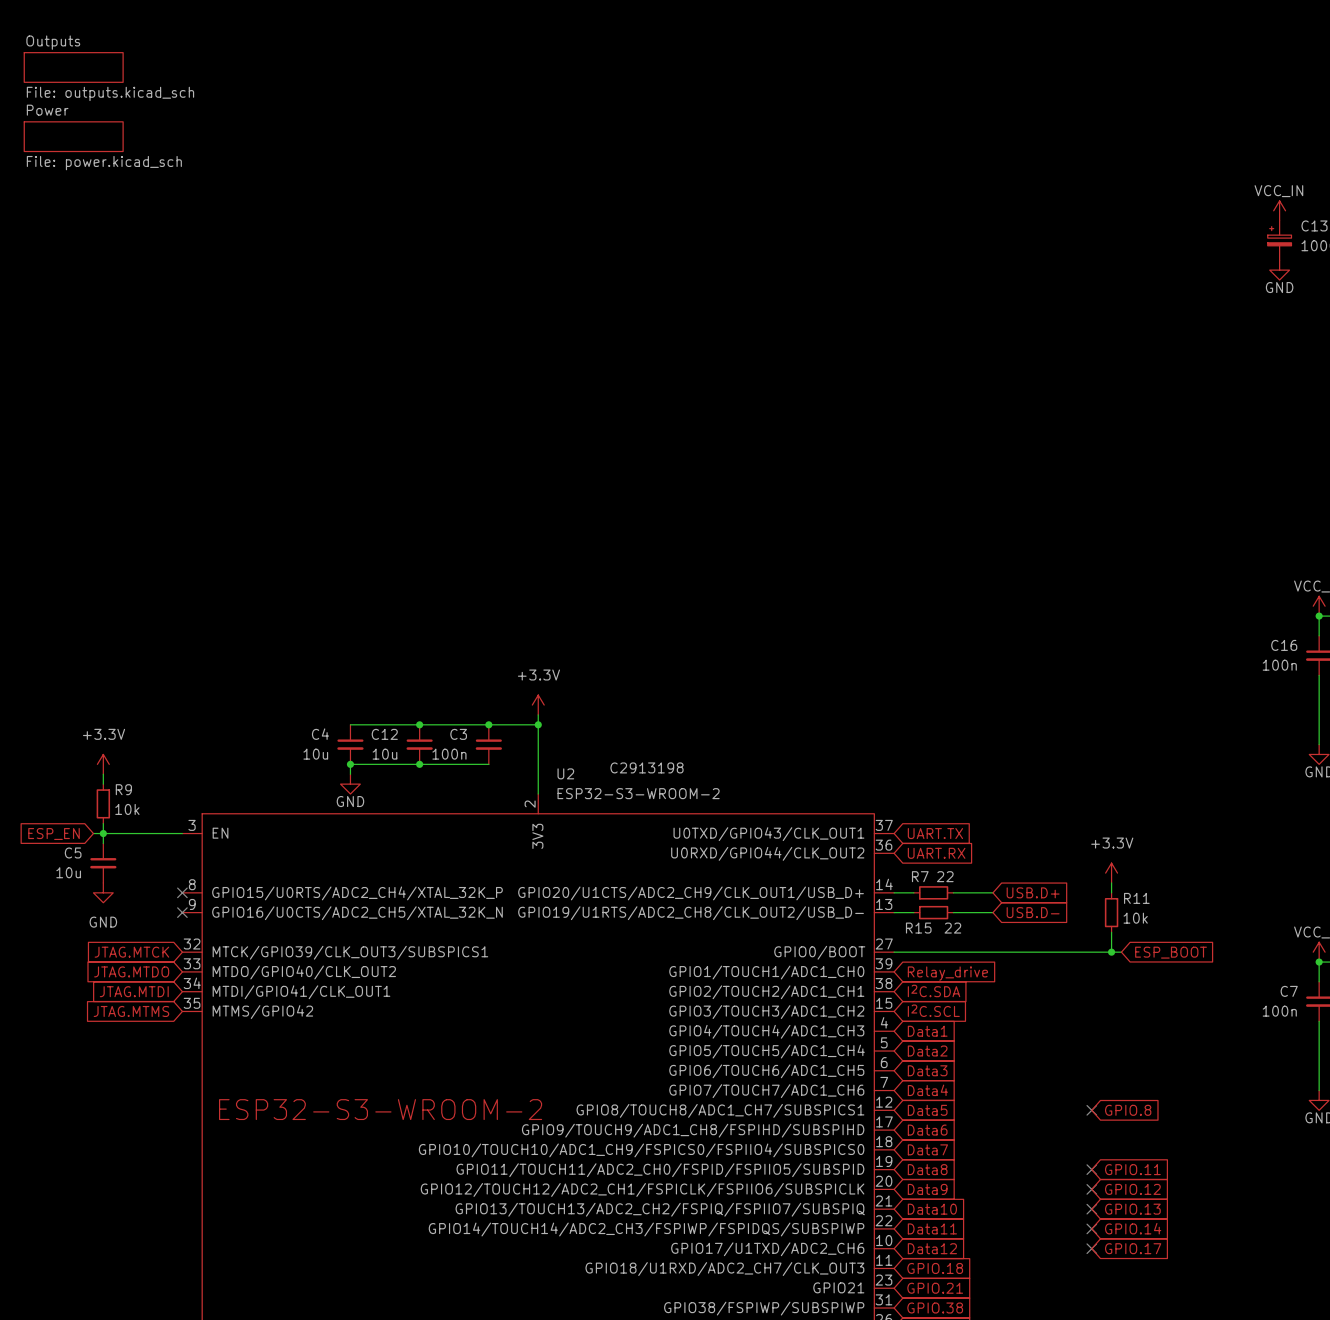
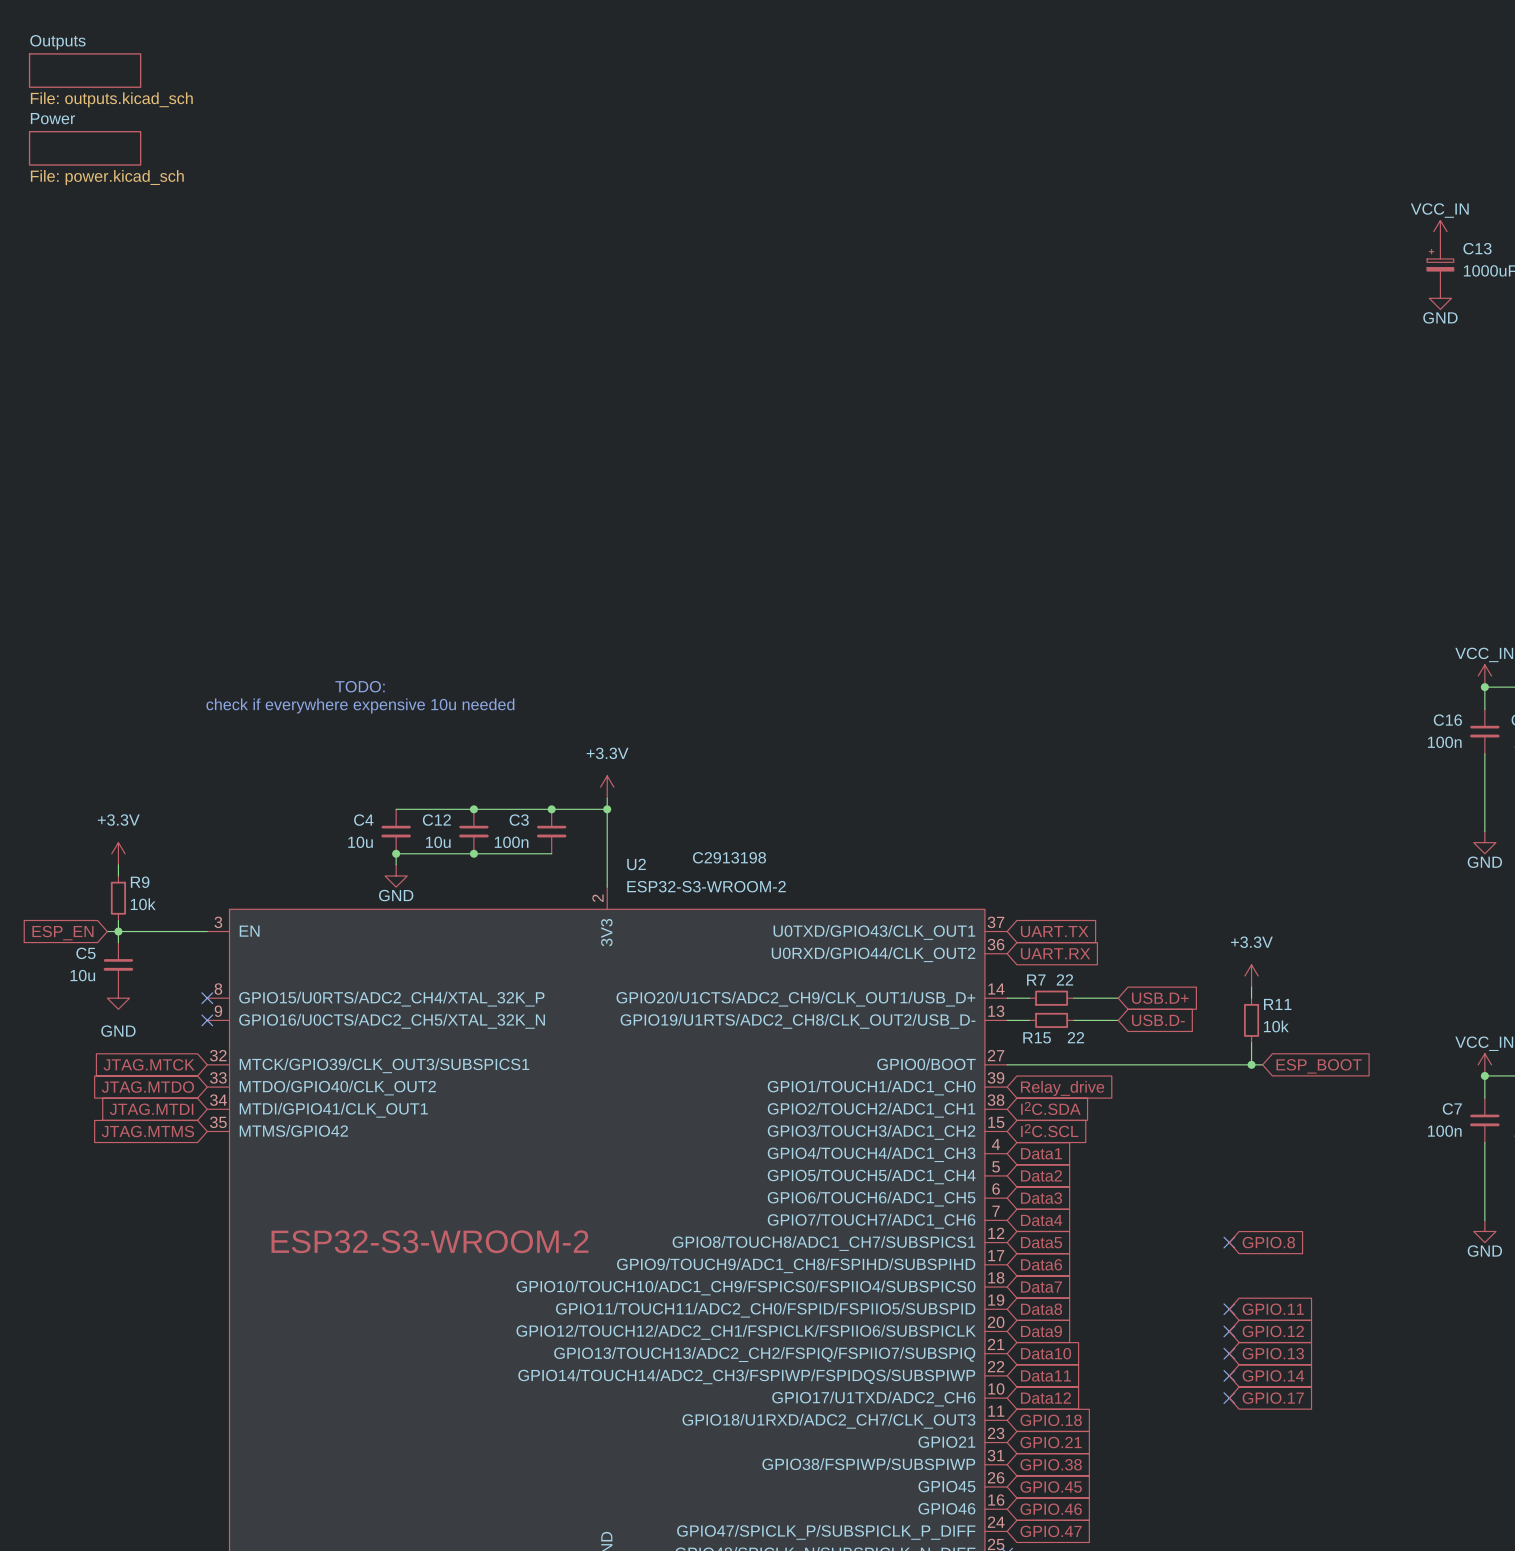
text: none -> TODO: (360, 686)
text: none -> check if everywhere expensive 10u needed (360, 705)

